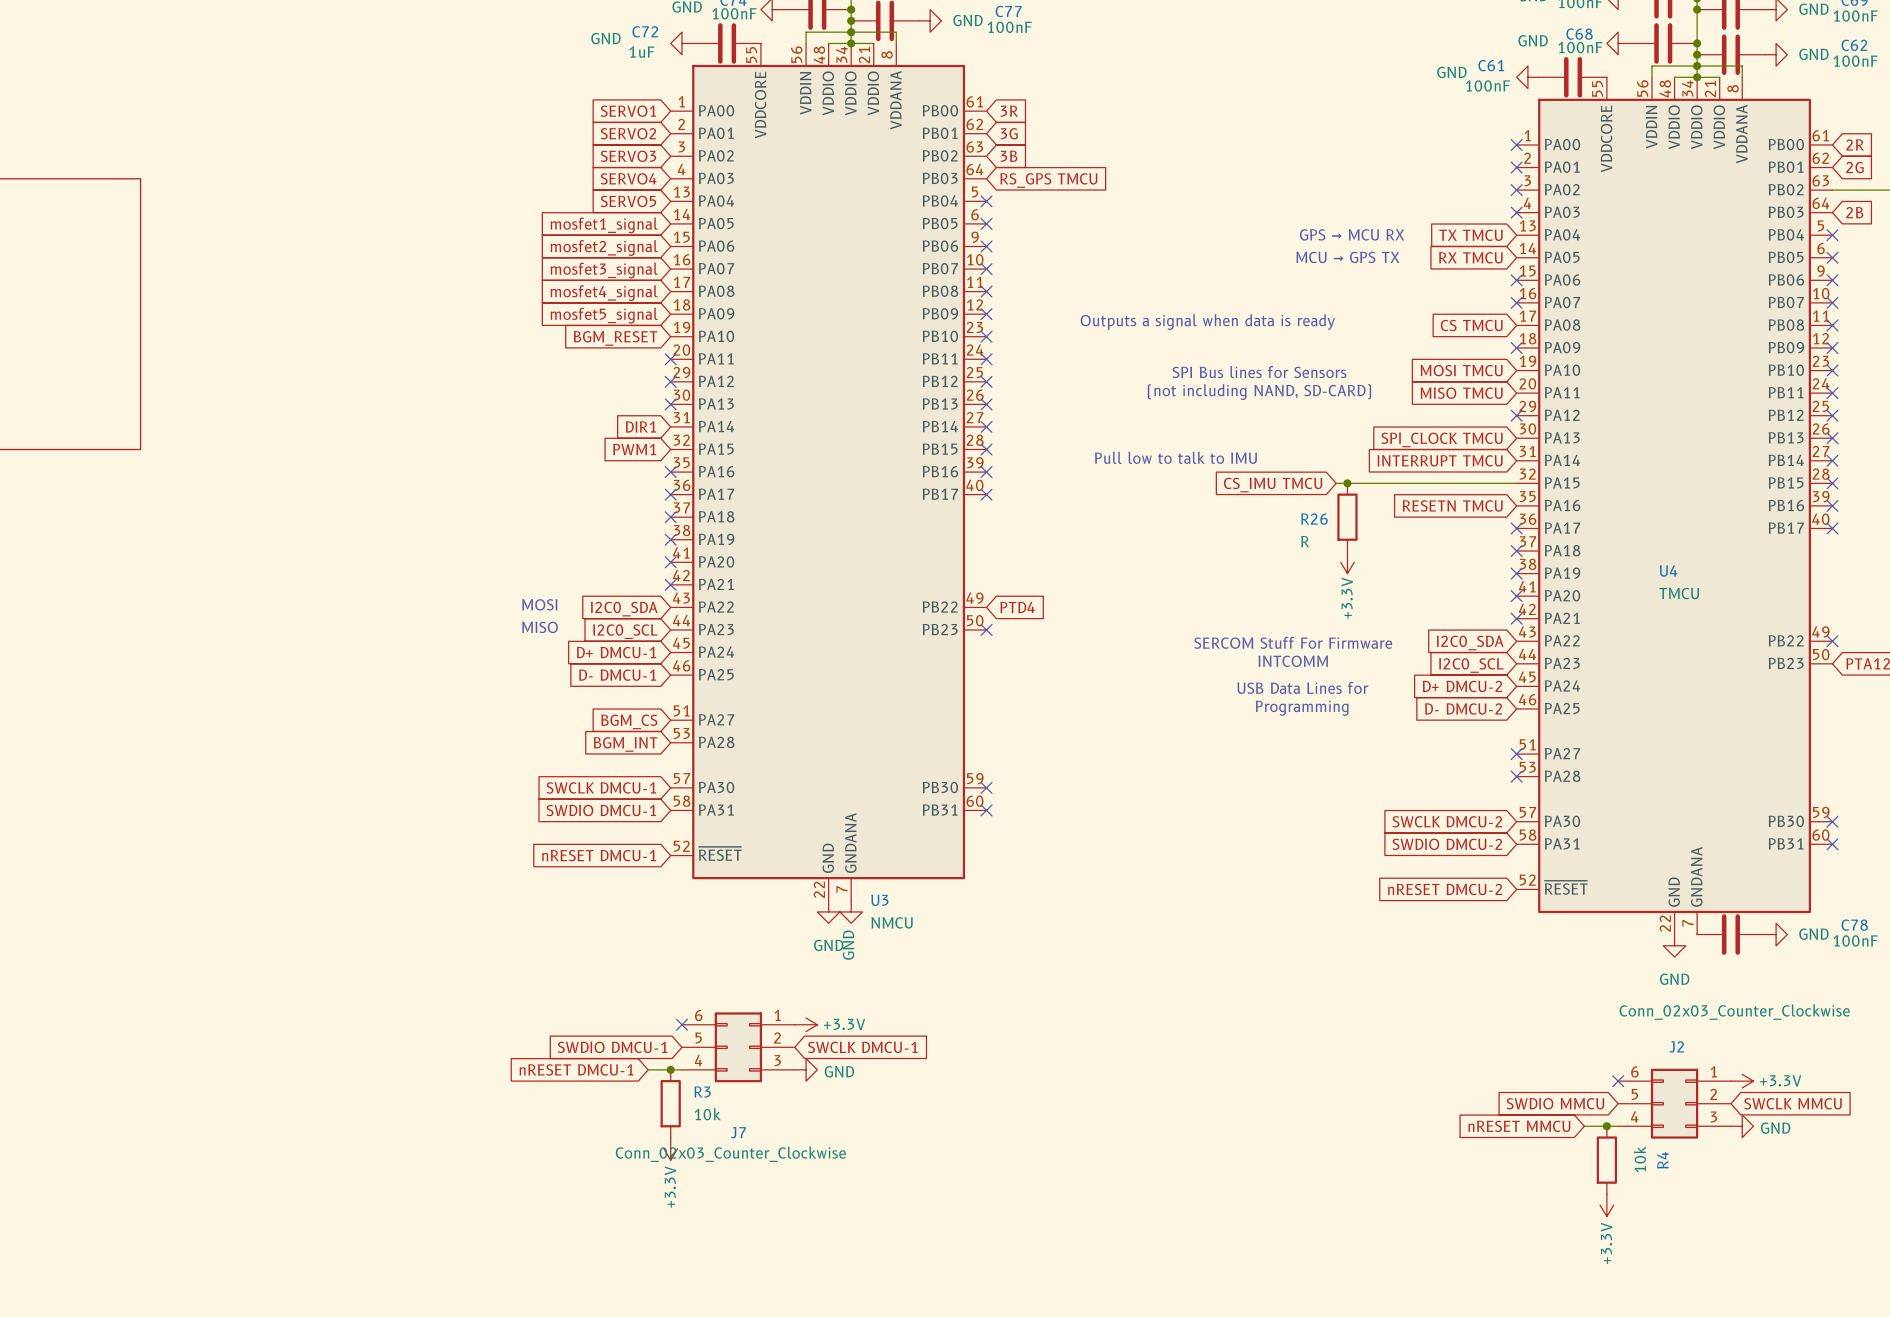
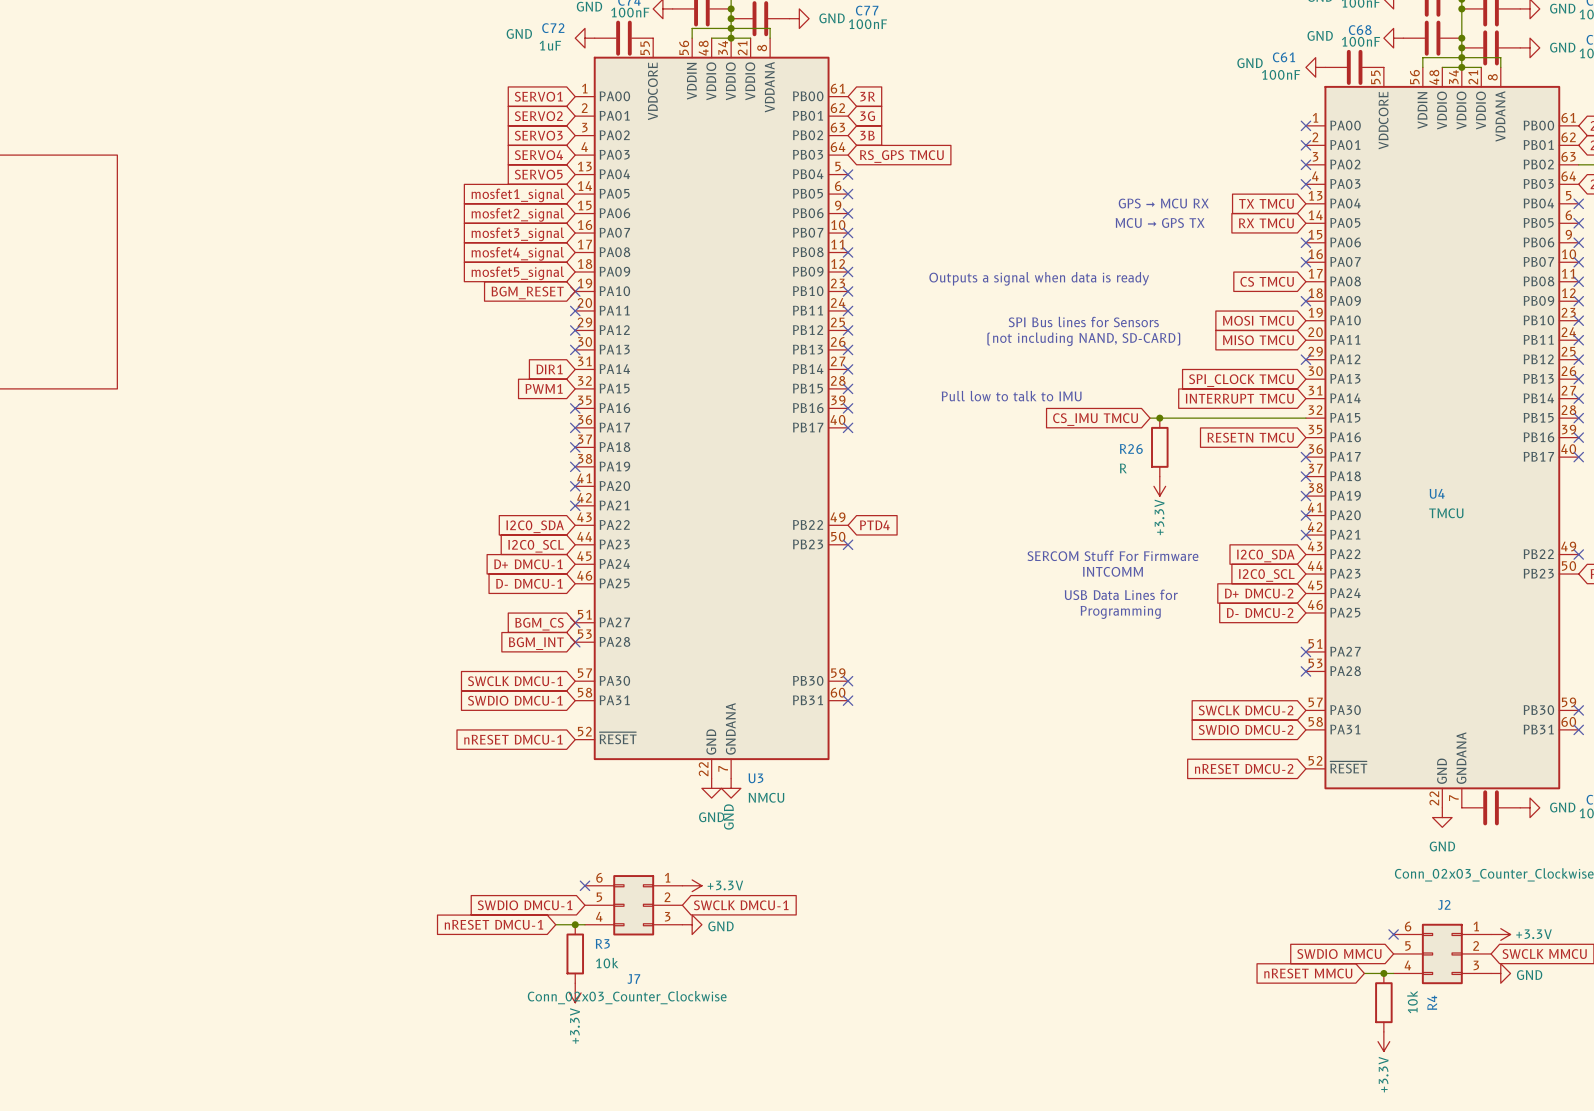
no-connect mark: none -> (575, 291)
text: MOSI (539, 604) -> none
text: MISO (540, 627) -> none
no-connect mark: none -> (575, 622)
no-connect mark: none -> (575, 642)

